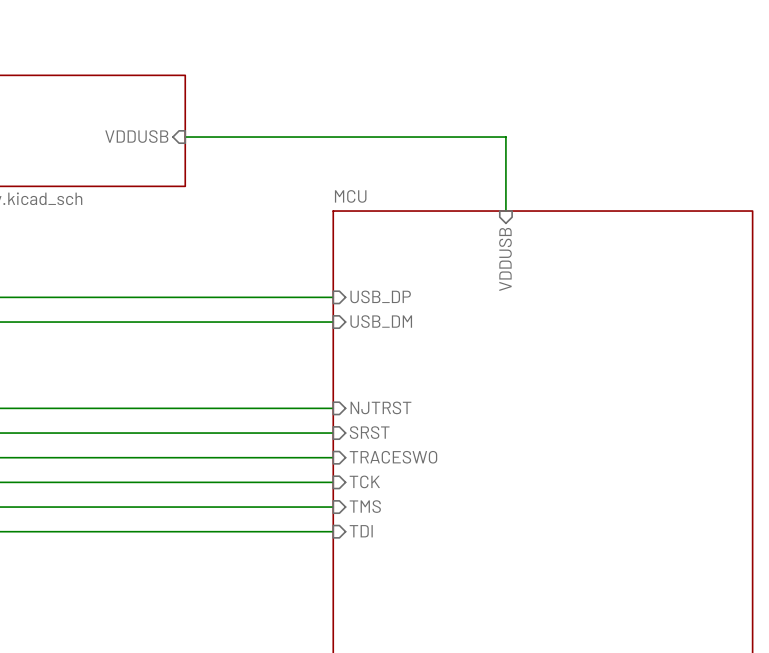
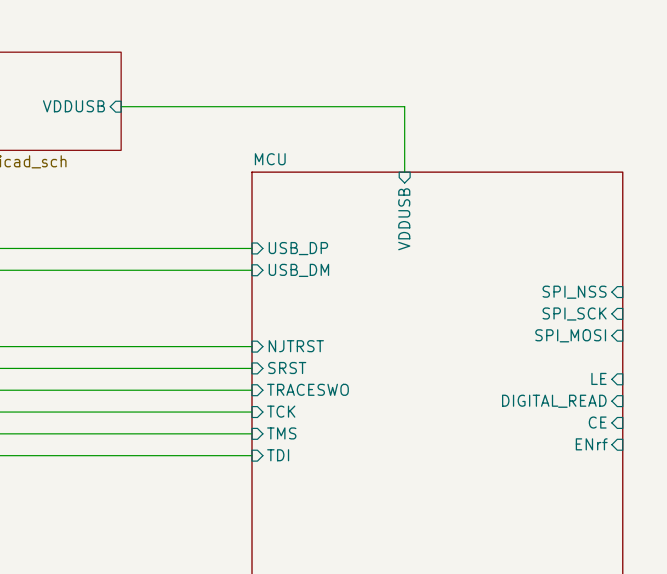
sheet pin: none -> SPI_NSS (574, 292)
sheet pin: none -> SPI_SCK (574, 314)
sheet pin: none -> SPI_MOSI (570, 335)
sheet pin: none -> LE (598, 378)
sheet pin: none -> DIGITAL_READ (554, 401)
sheet pin: none -> CE (597, 422)
sheet pin: none -> ENrf (591, 444)

